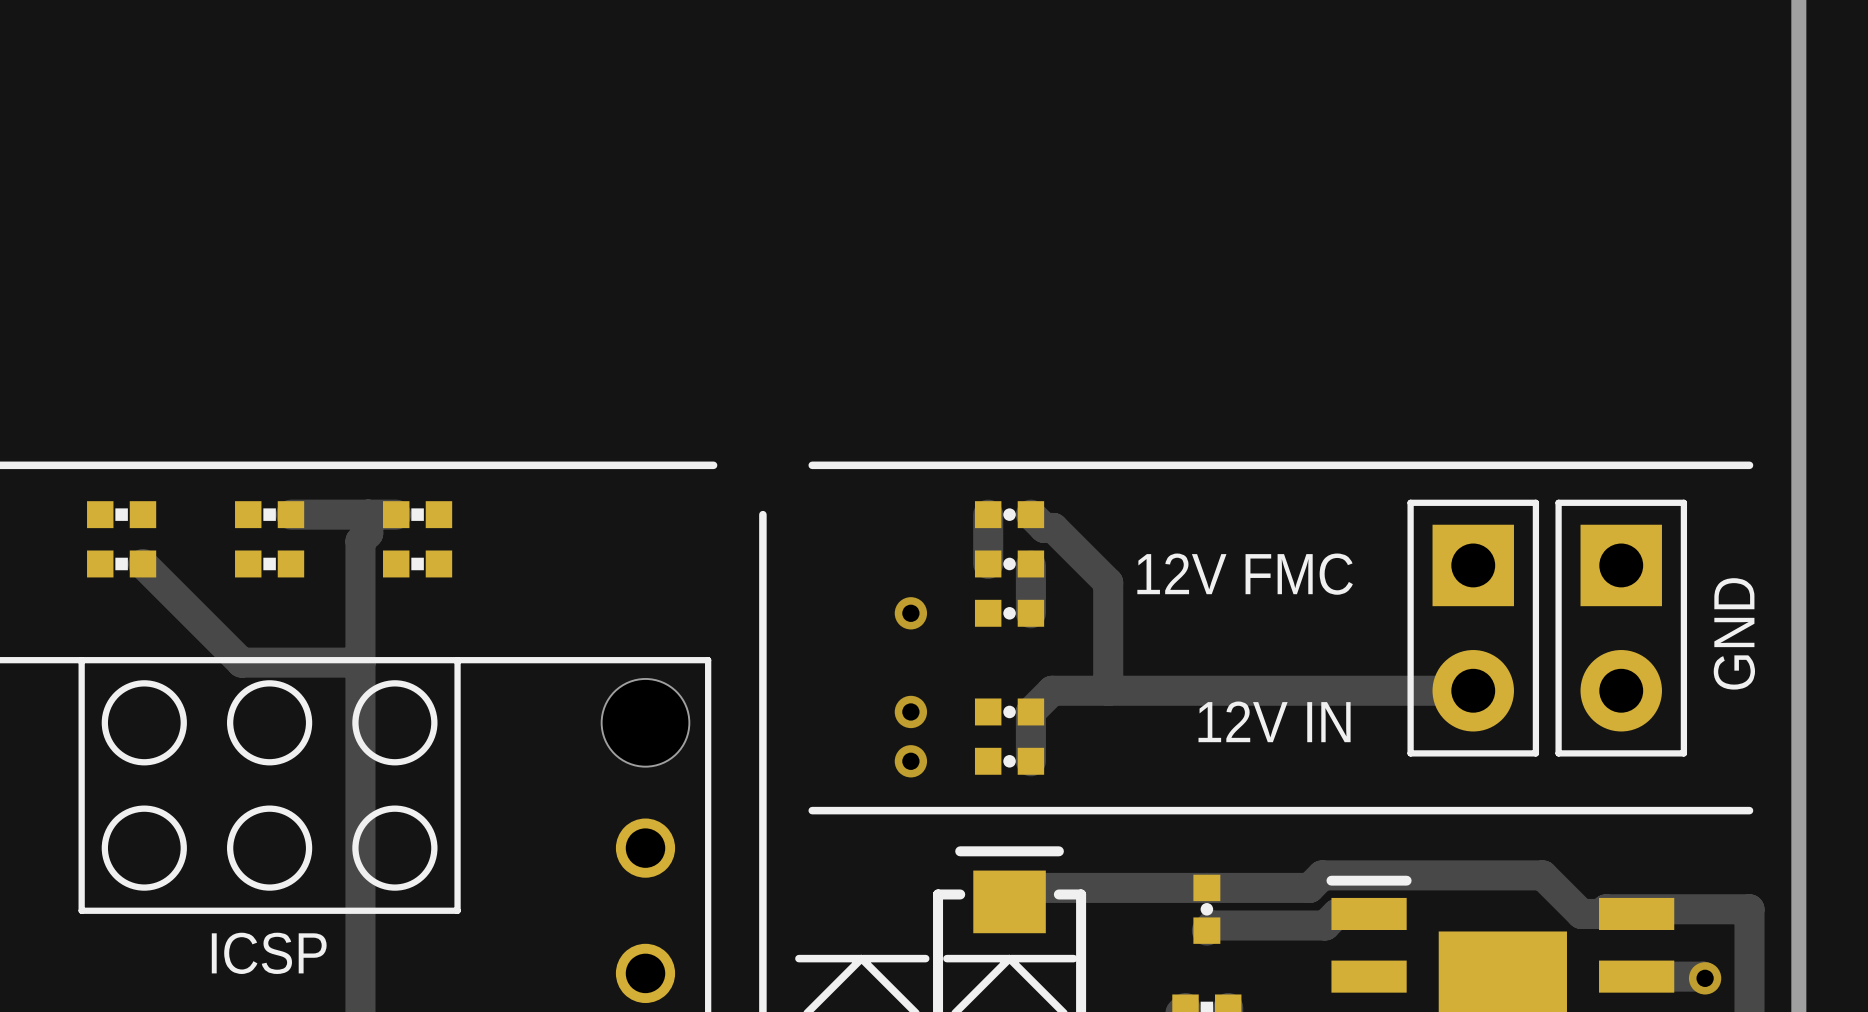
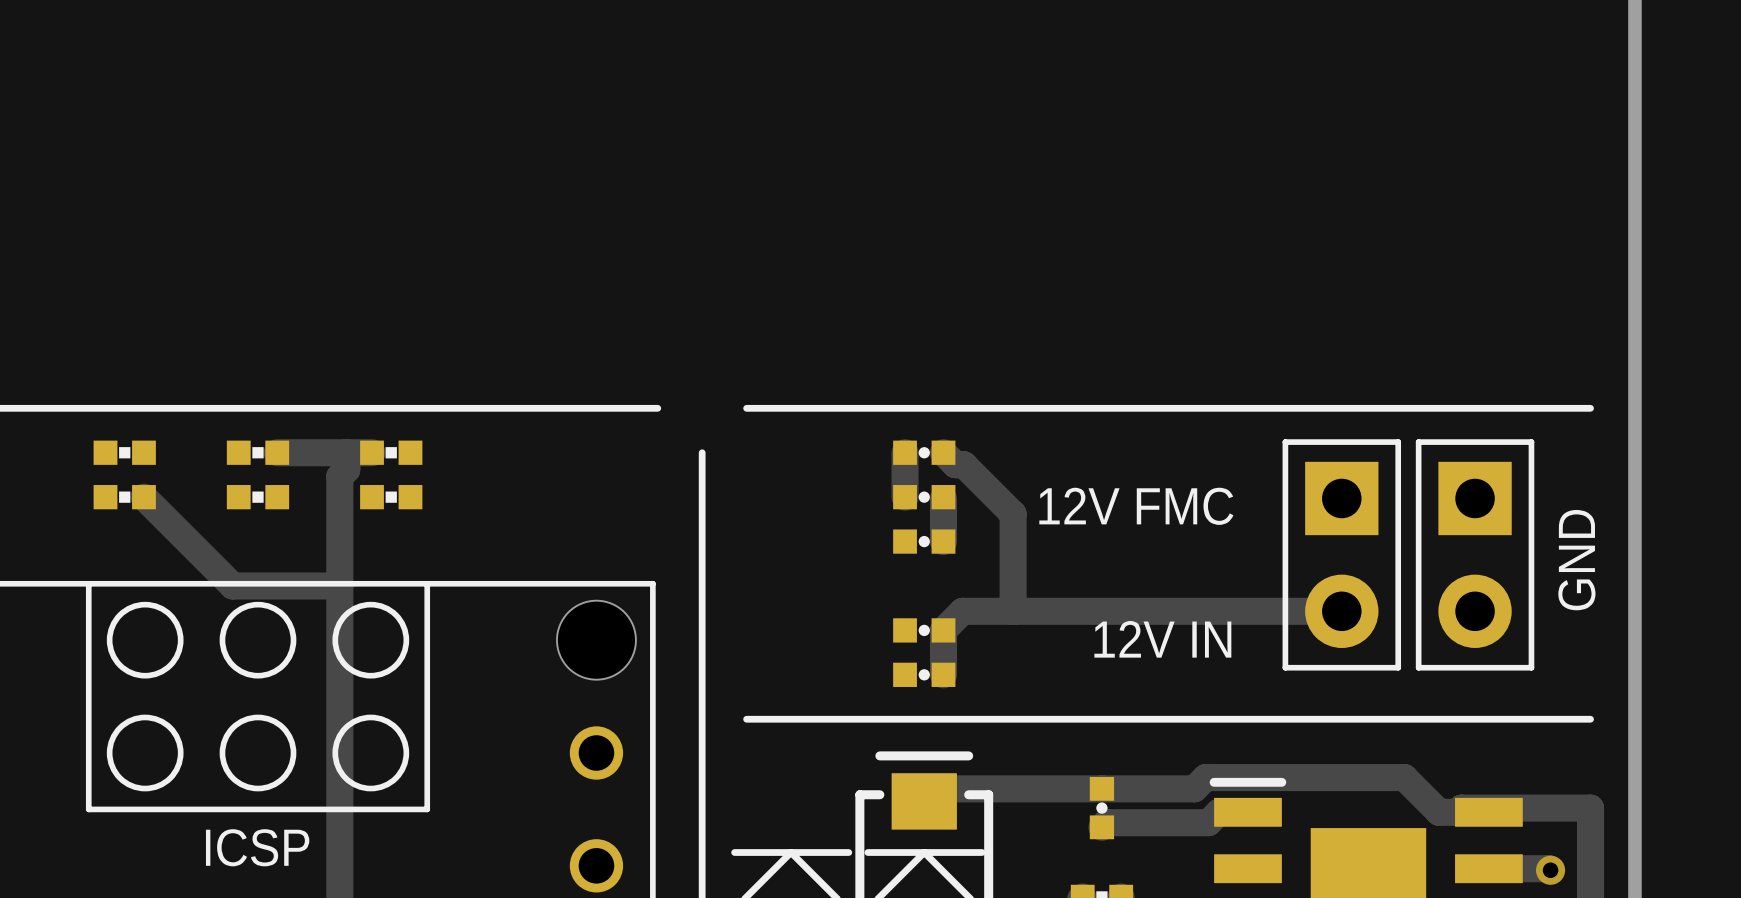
via: (910, 613) -> none
via: (910, 711) -> none
via: (910, 761) -> none

